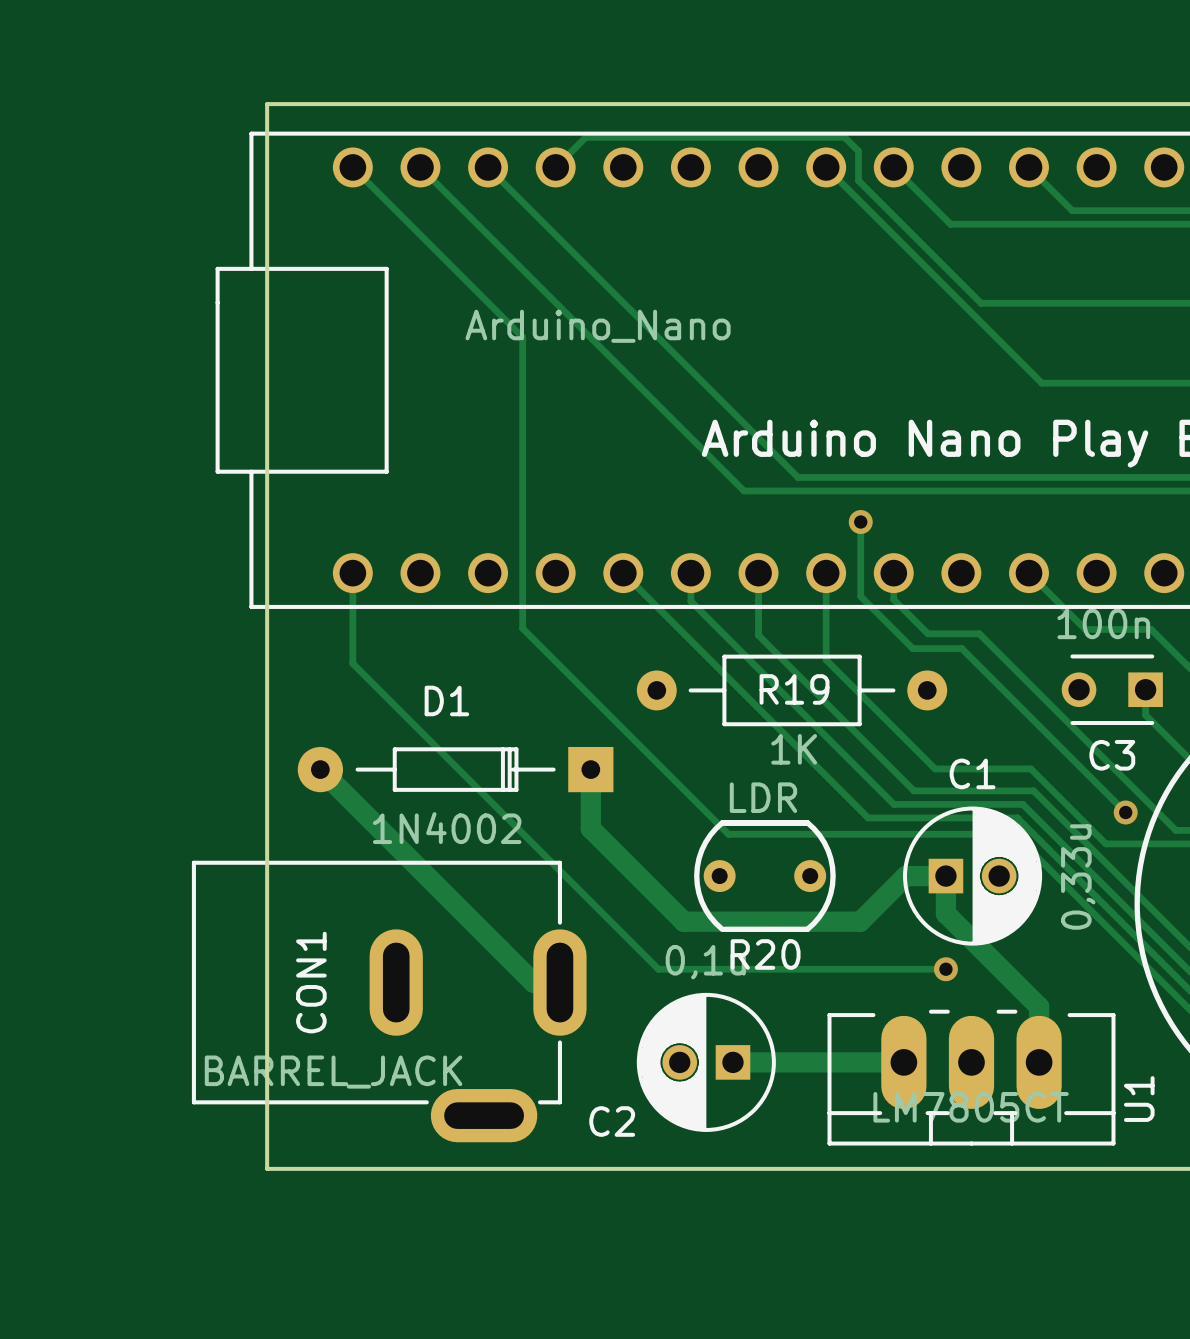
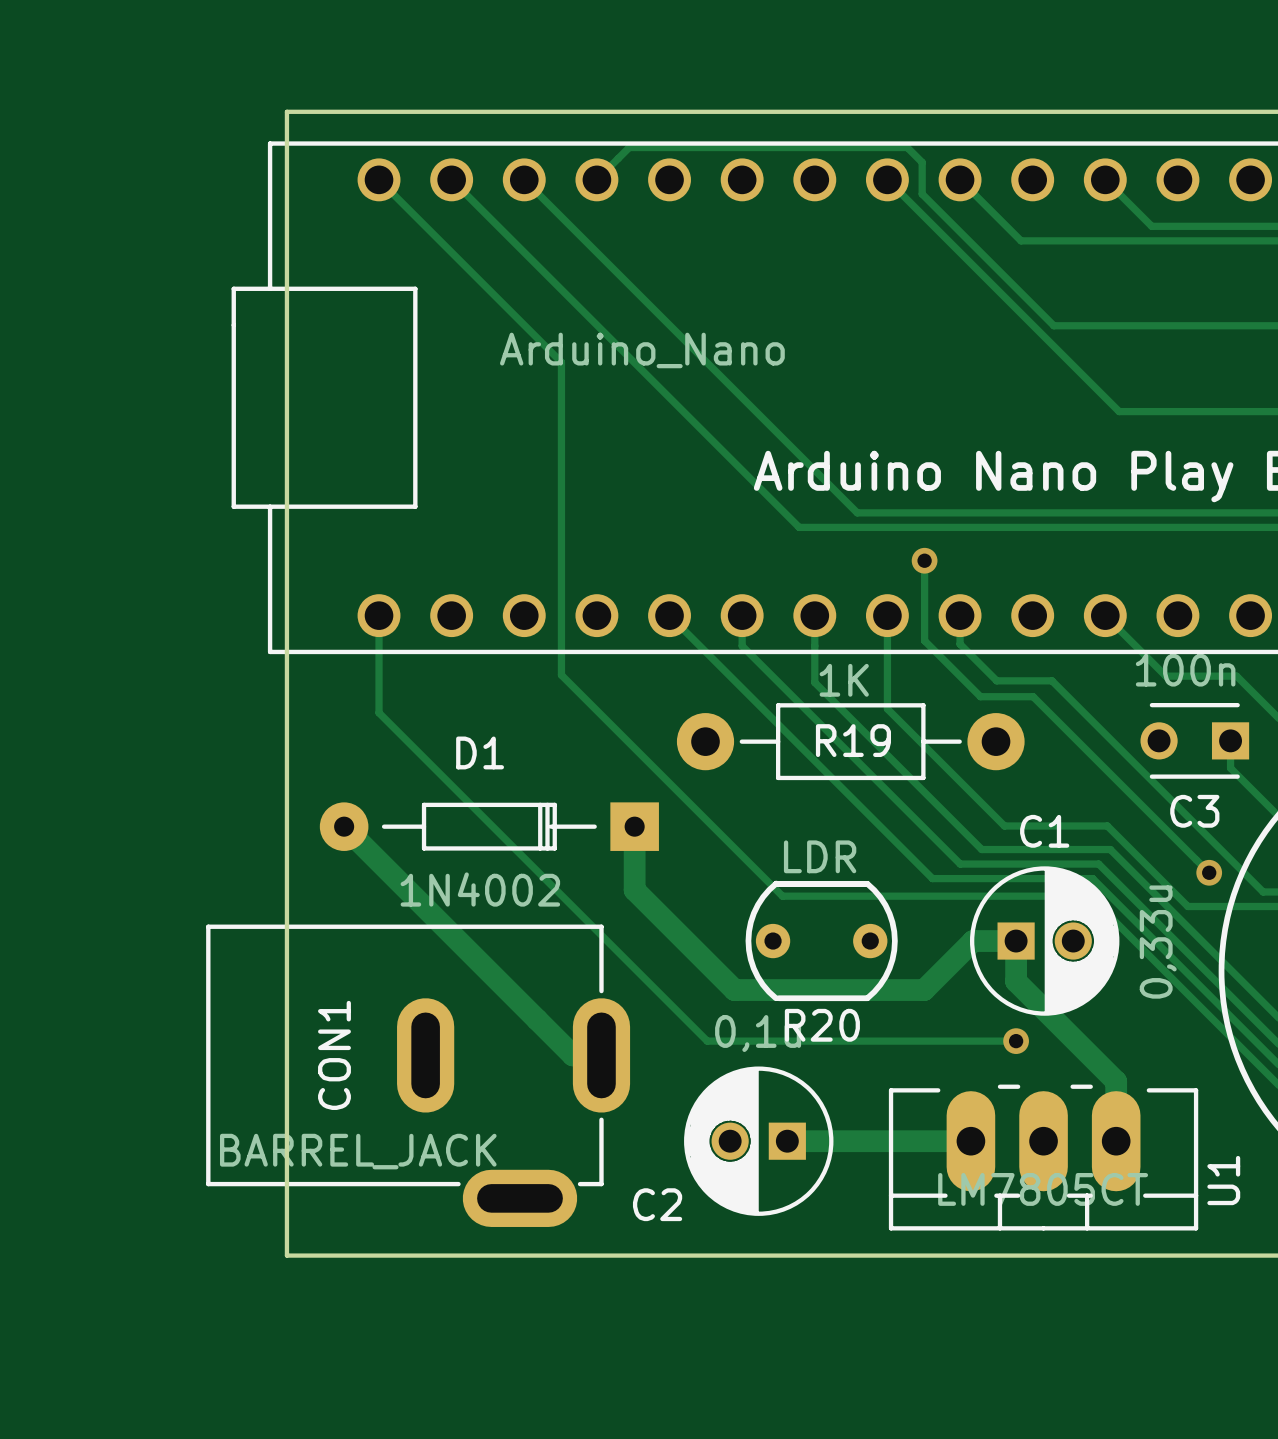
R19 footprint: [636, 654, 948, 727] -> [676, 703, 1025, 781]
R19 value position: 1K (794, 749) -> 1K (844, 680)

